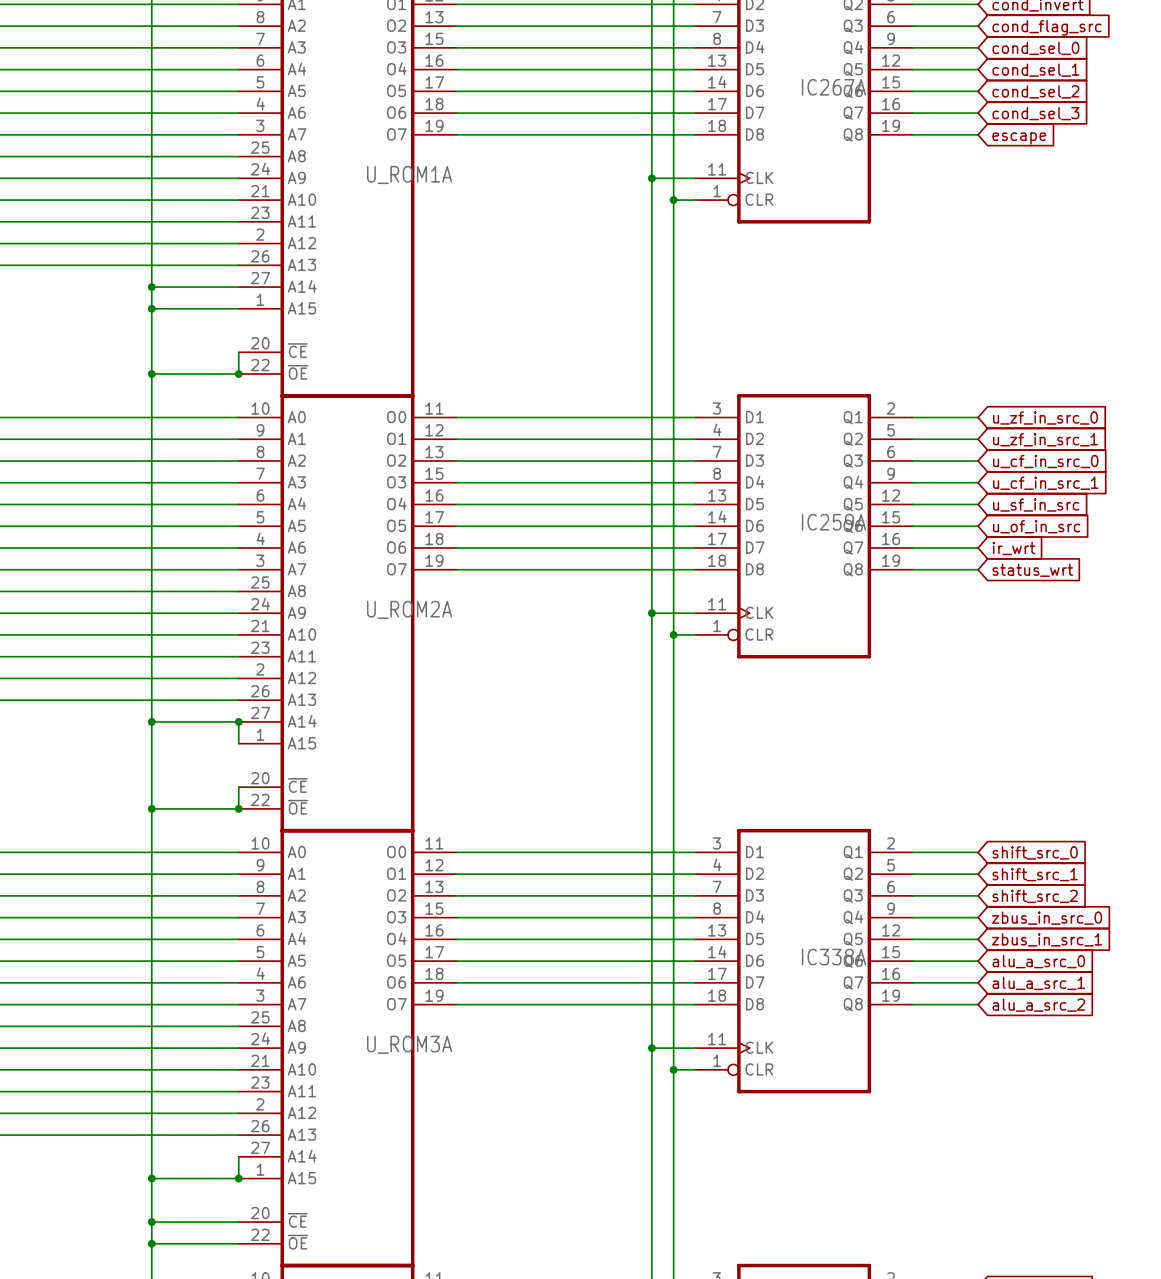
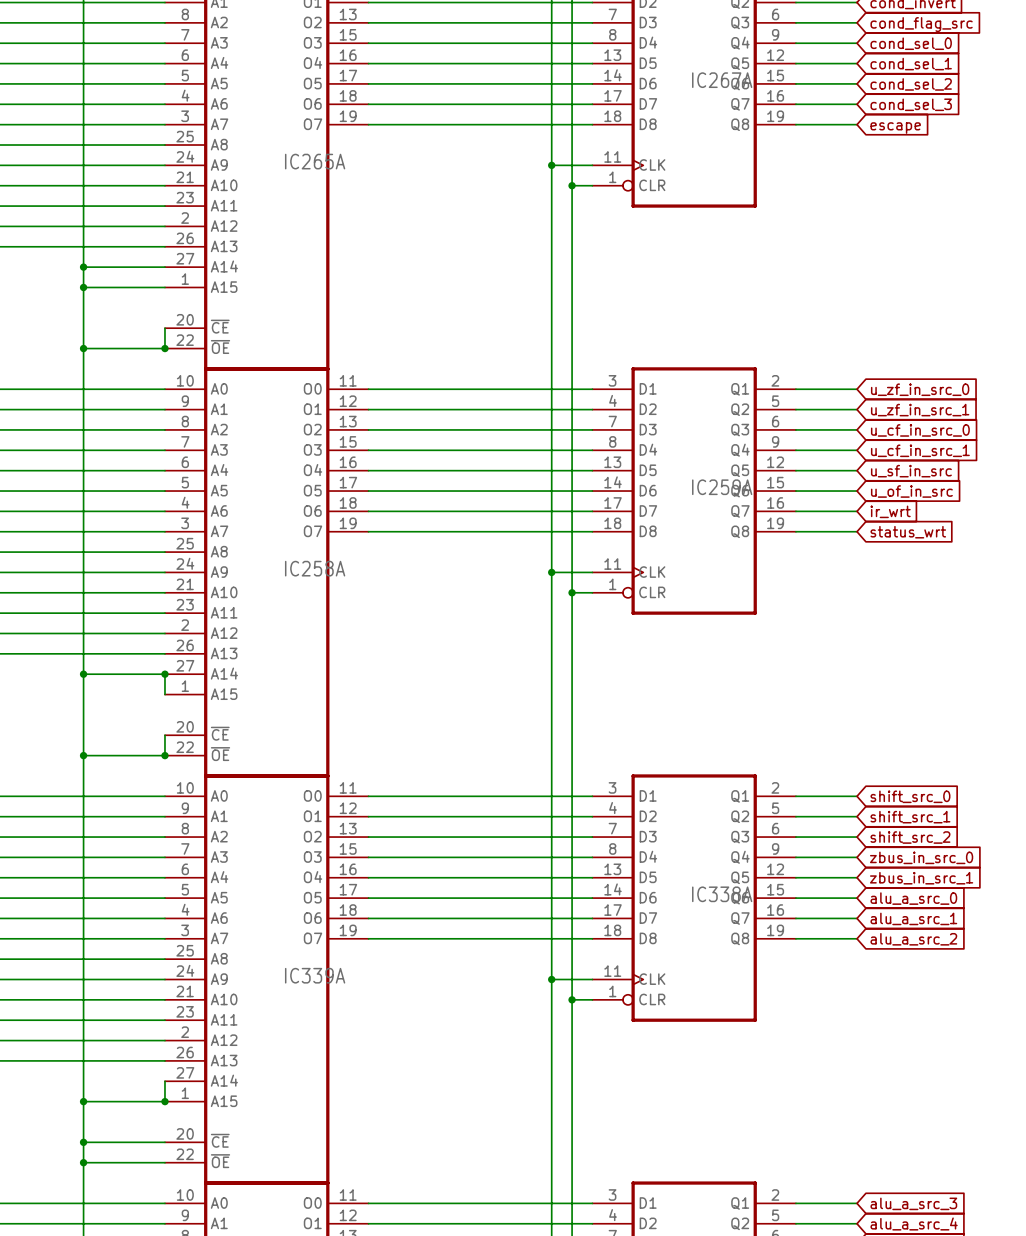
U_ROM1A name: U_ROM1A (409, 175) -> IC265A (315, 161)
U_ROM2A name: U_ROM2A (409, 609) -> IC258A (315, 568)
U_ROM3A name: U_ROM3A (409, 1044) -> IC339A (315, 975)

